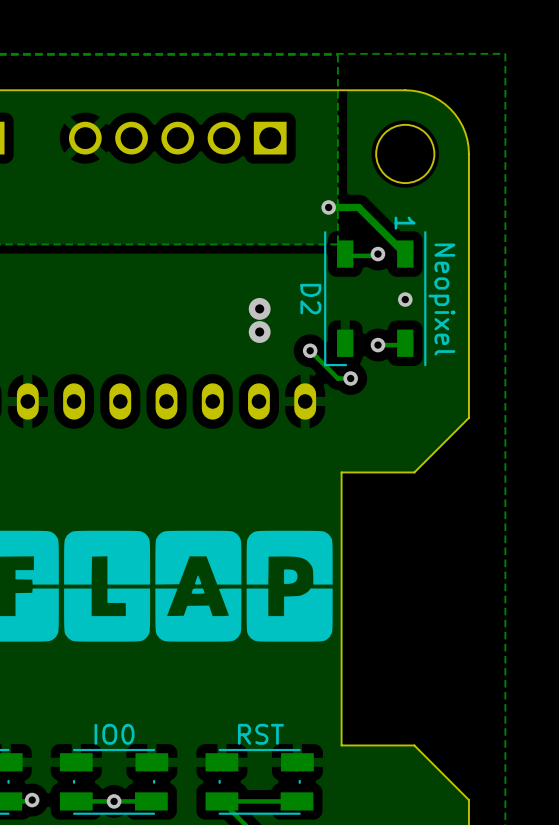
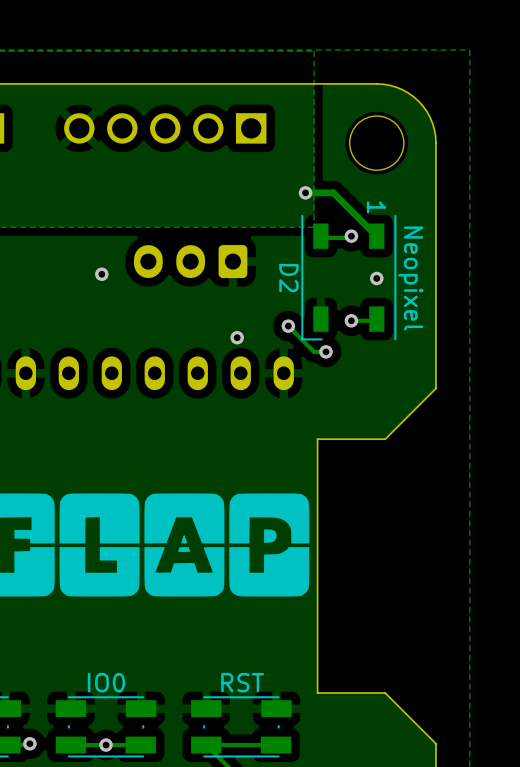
part: none -> (190, 261)
via: none -> (101, 274)
via: (259, 308) -> none
via: (259, 332) -> none
via: none -> (237, 337)

